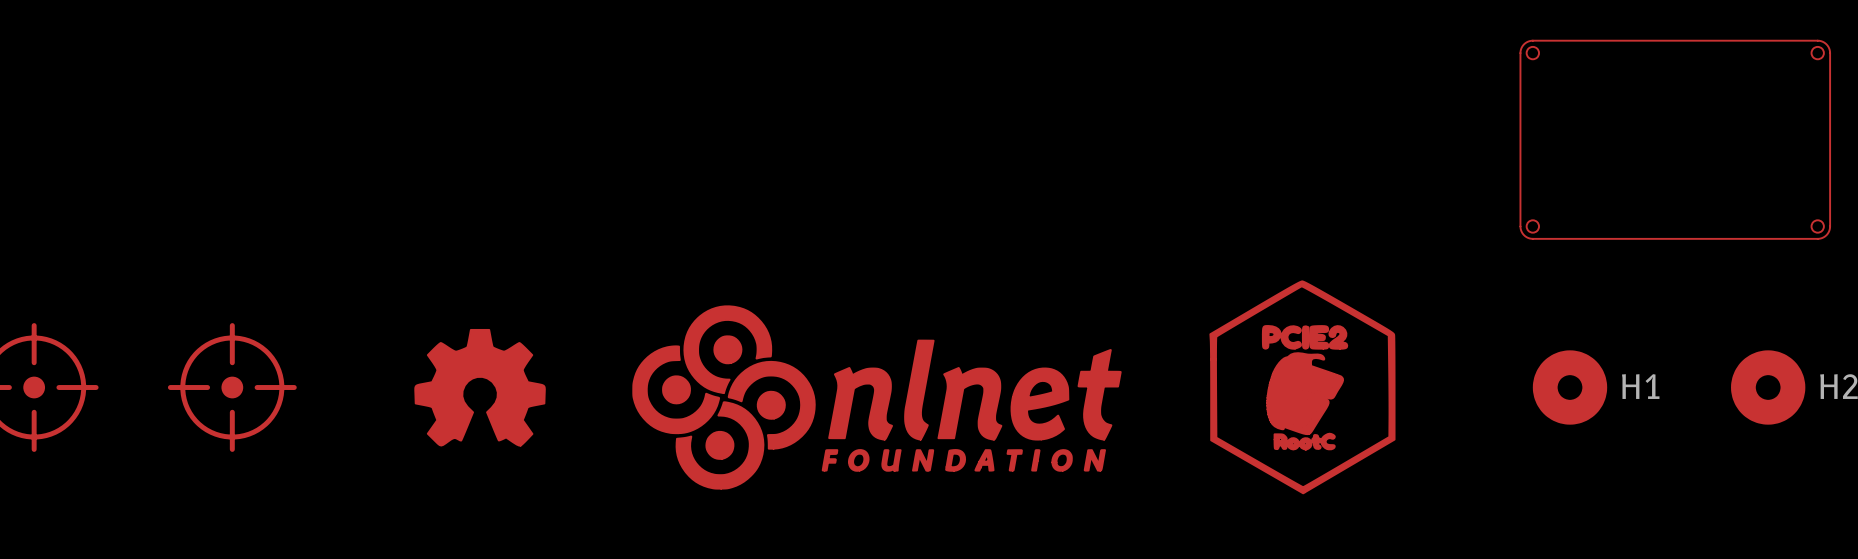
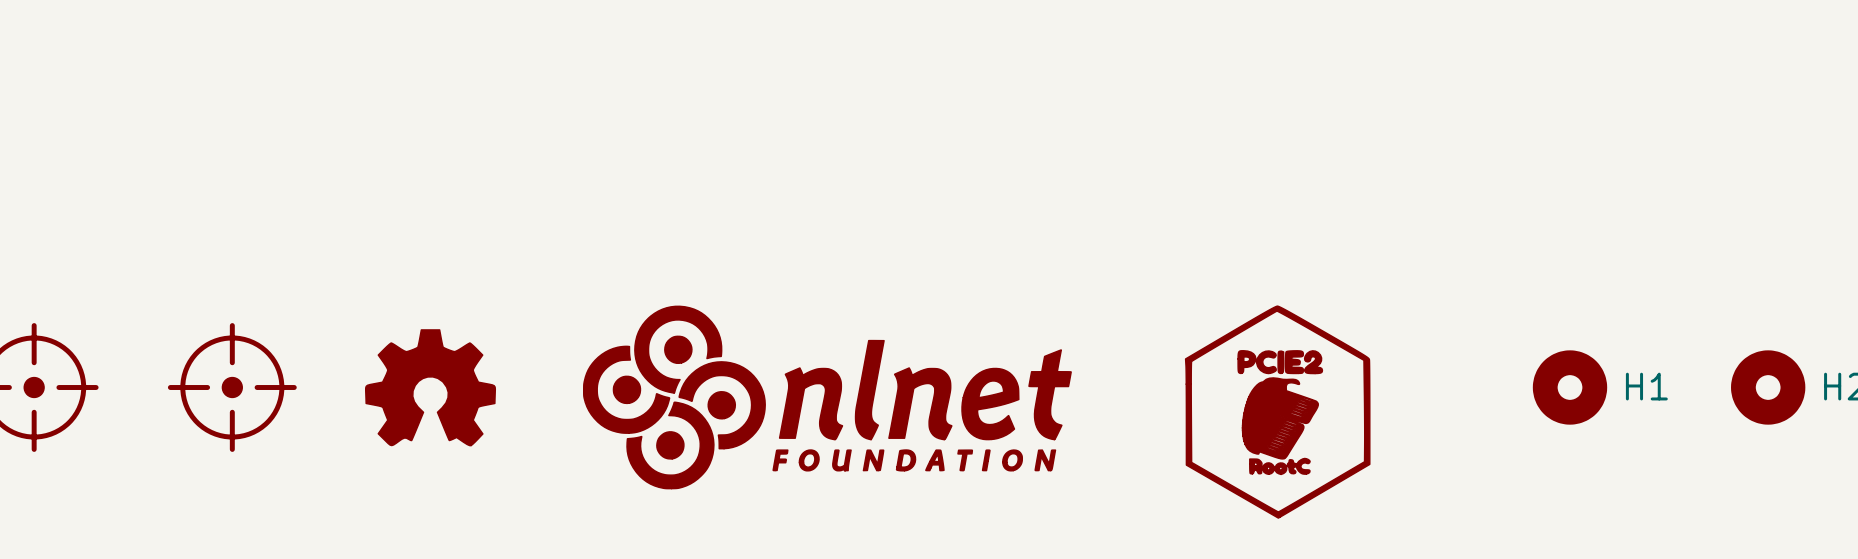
part: (1675, 139) -> none
part position: (480, 387) -> (430, 387)
part position: (1302, 387) -> (1277, 412)
part position: (876, 397) -> (827, 397)

